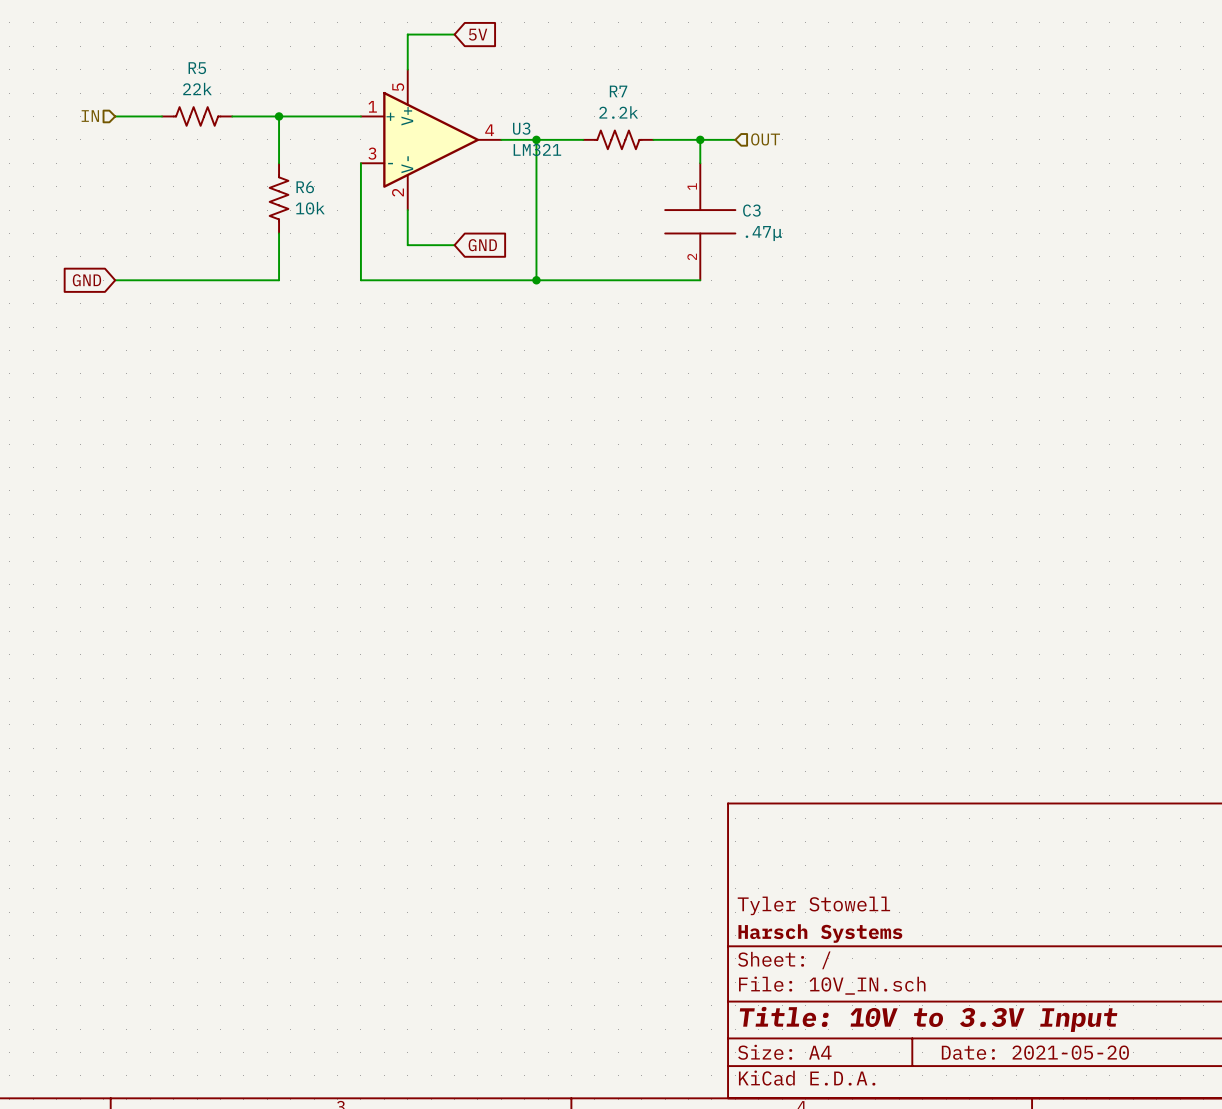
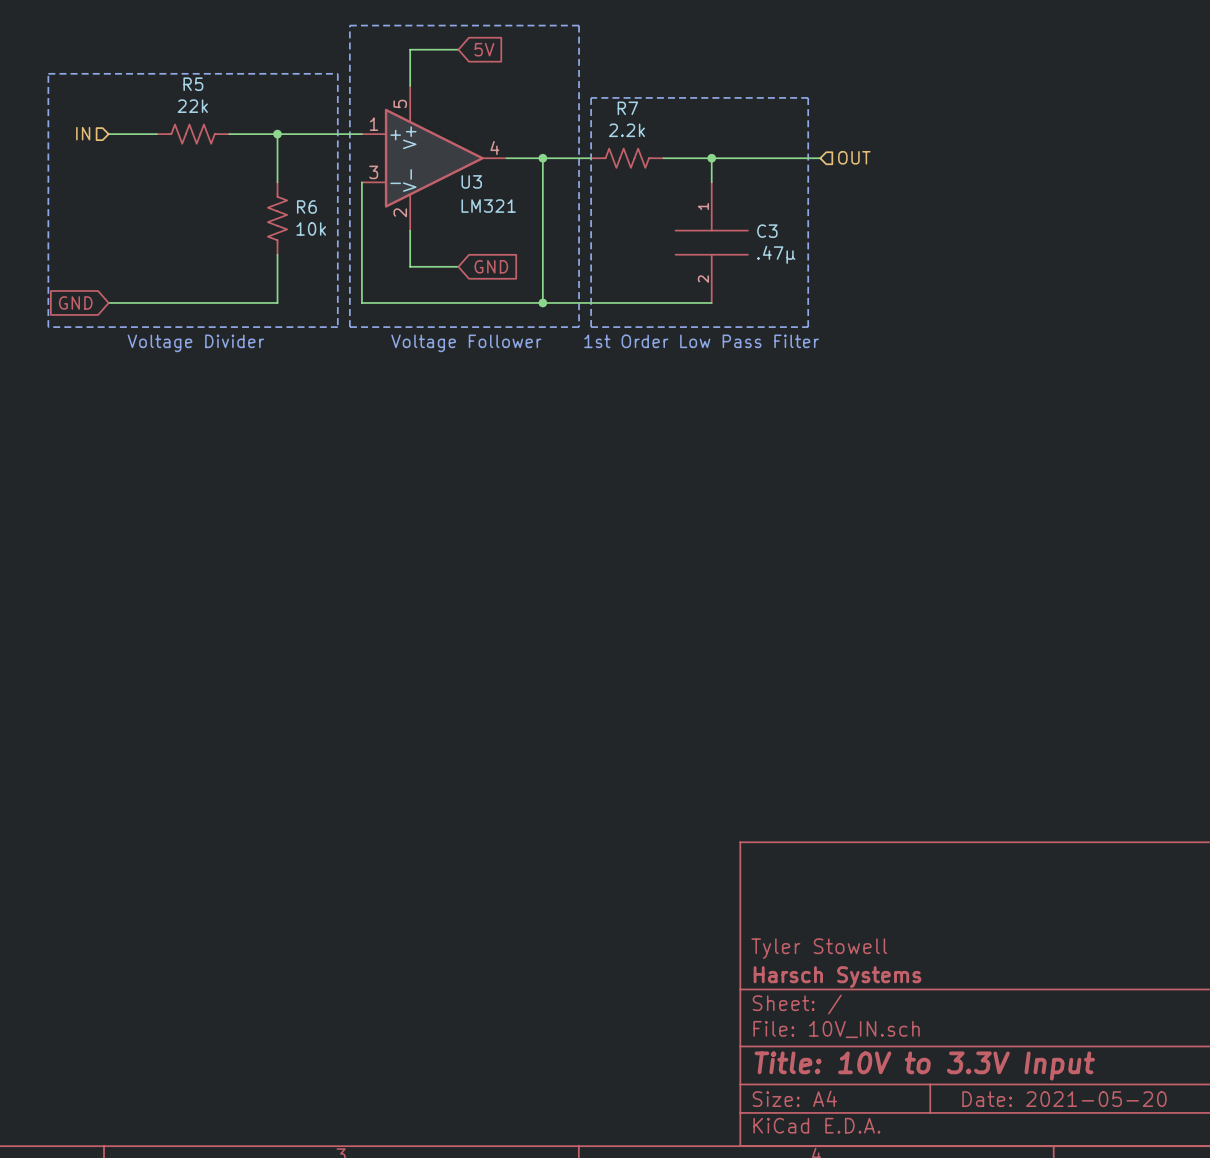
line: none -> (349, 25) (579, 25) (579, 327) (349, 327) (349, 25)
line: none -> (48, 73) (337, 73) (337, 327) (48, 327) (48, 73)
line: none -> (591, 97) (591, 327) (808, 327) (808, 97) (591, 97)
U3 name position: U3 (521, 128) -> U3 (471, 181)
wire: none -> (747, 158) (820, 158)
hierarchical label position: OUT (765, 139) -> OUT (854, 157)
U3 value position: LM321 (537, 149) -> LM321 (488, 206)
text: none -> 1st Order Low Pass Filter (701, 341)
text: none -> Voltage Divider (195, 343)
text: none -> Voltage Follower (466, 343)

